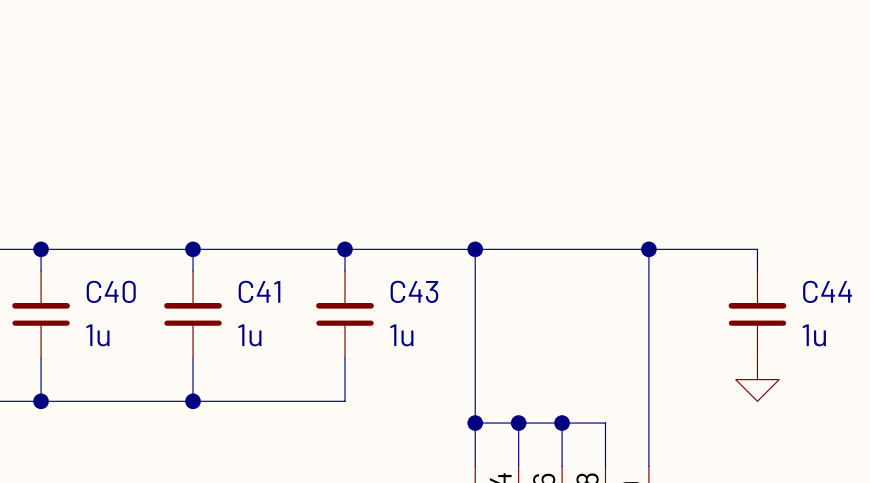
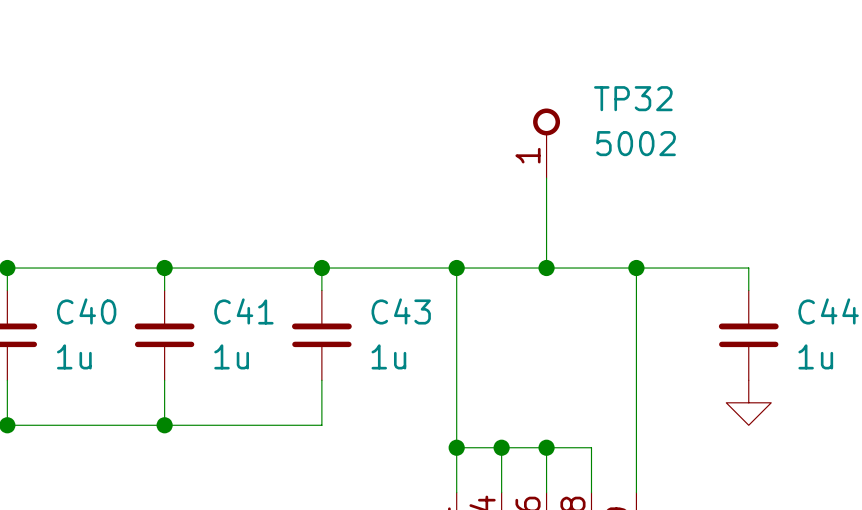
TP32: none -> (546, 143)
wire: none -> (546, 178) (546, 268)
junction: none -> (546, 268)

